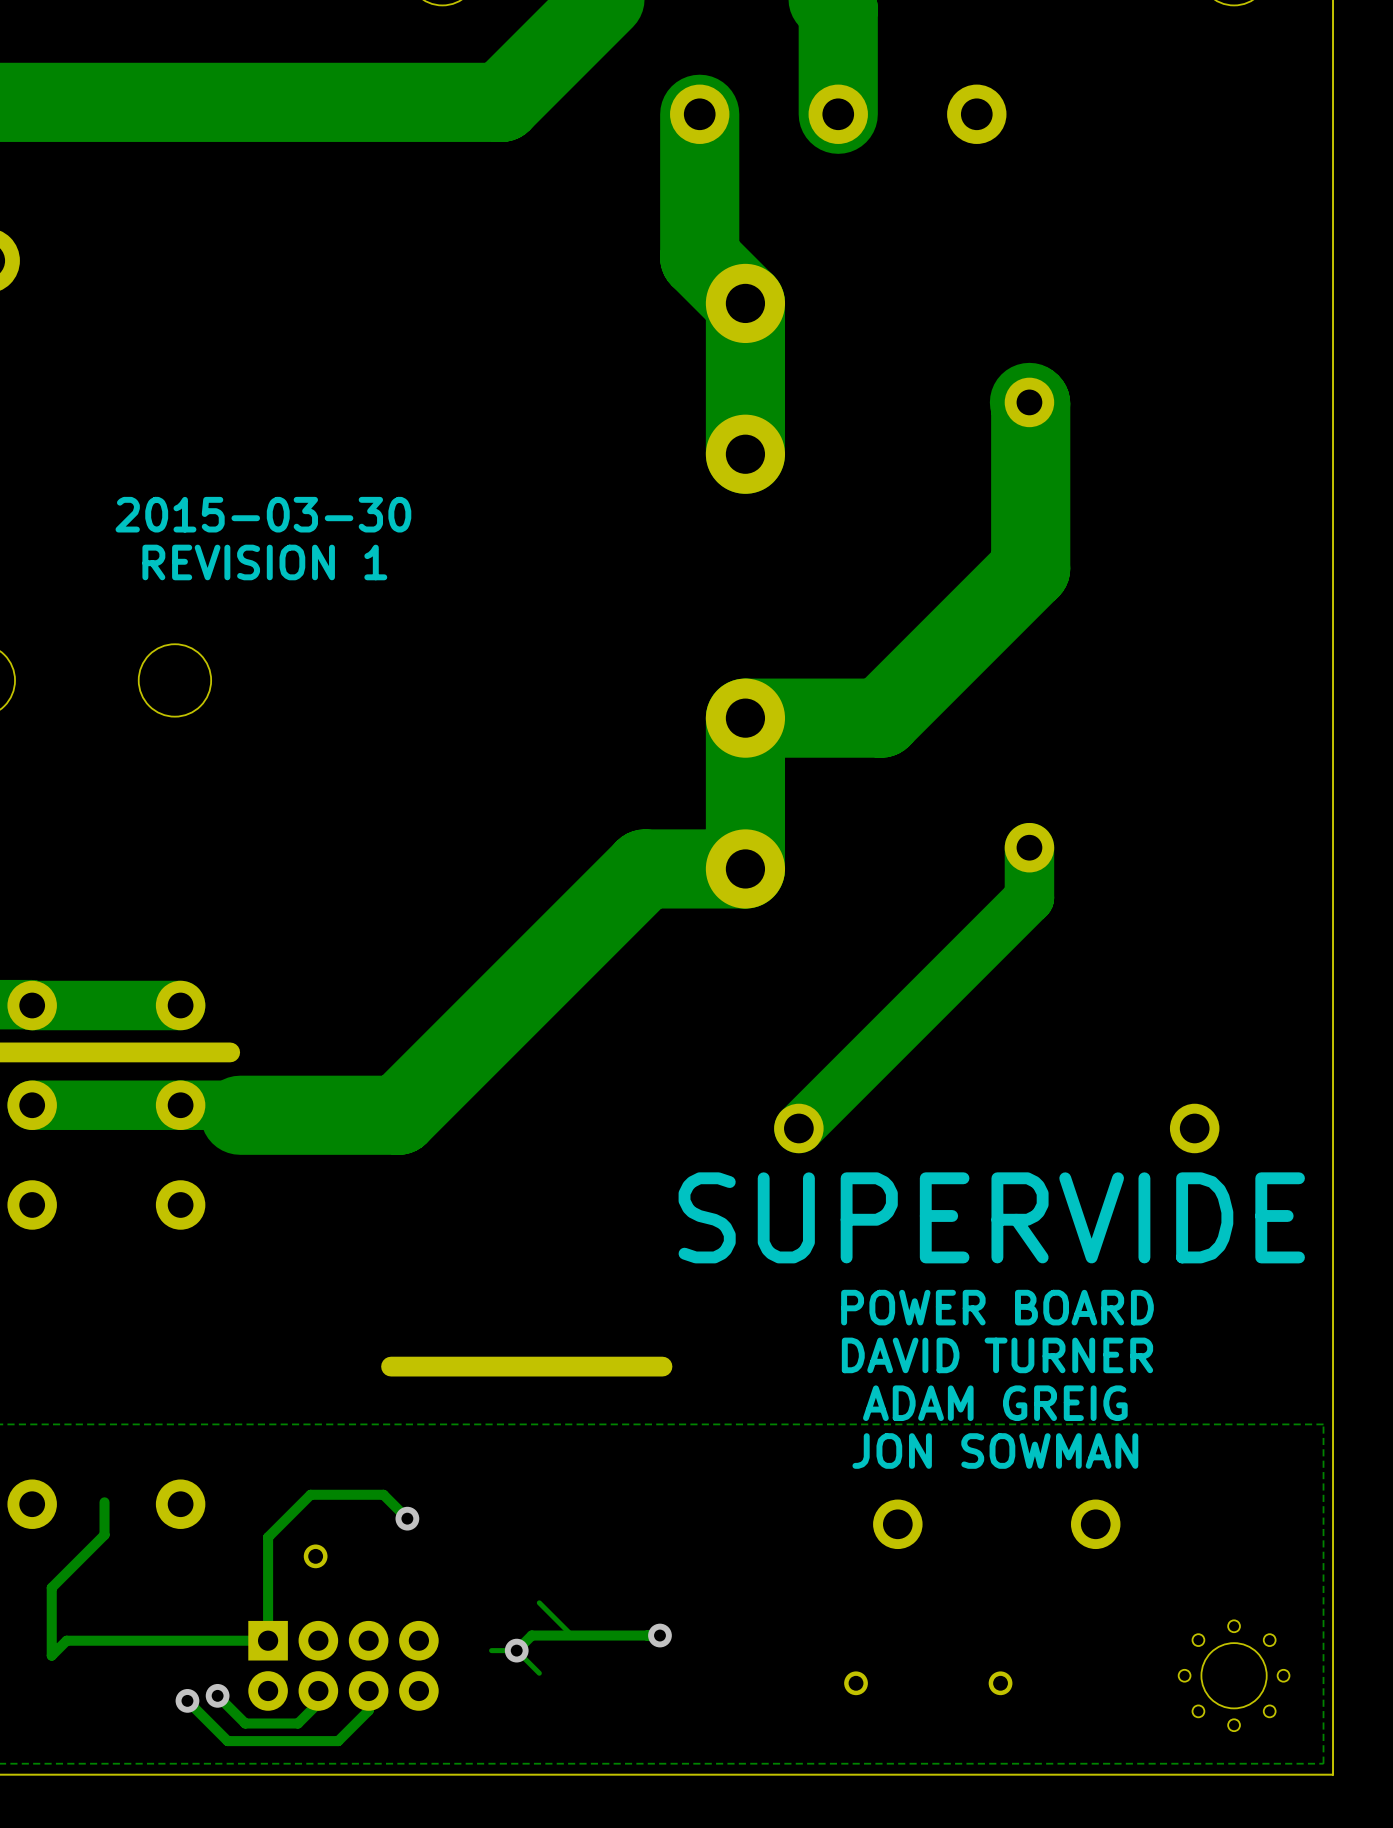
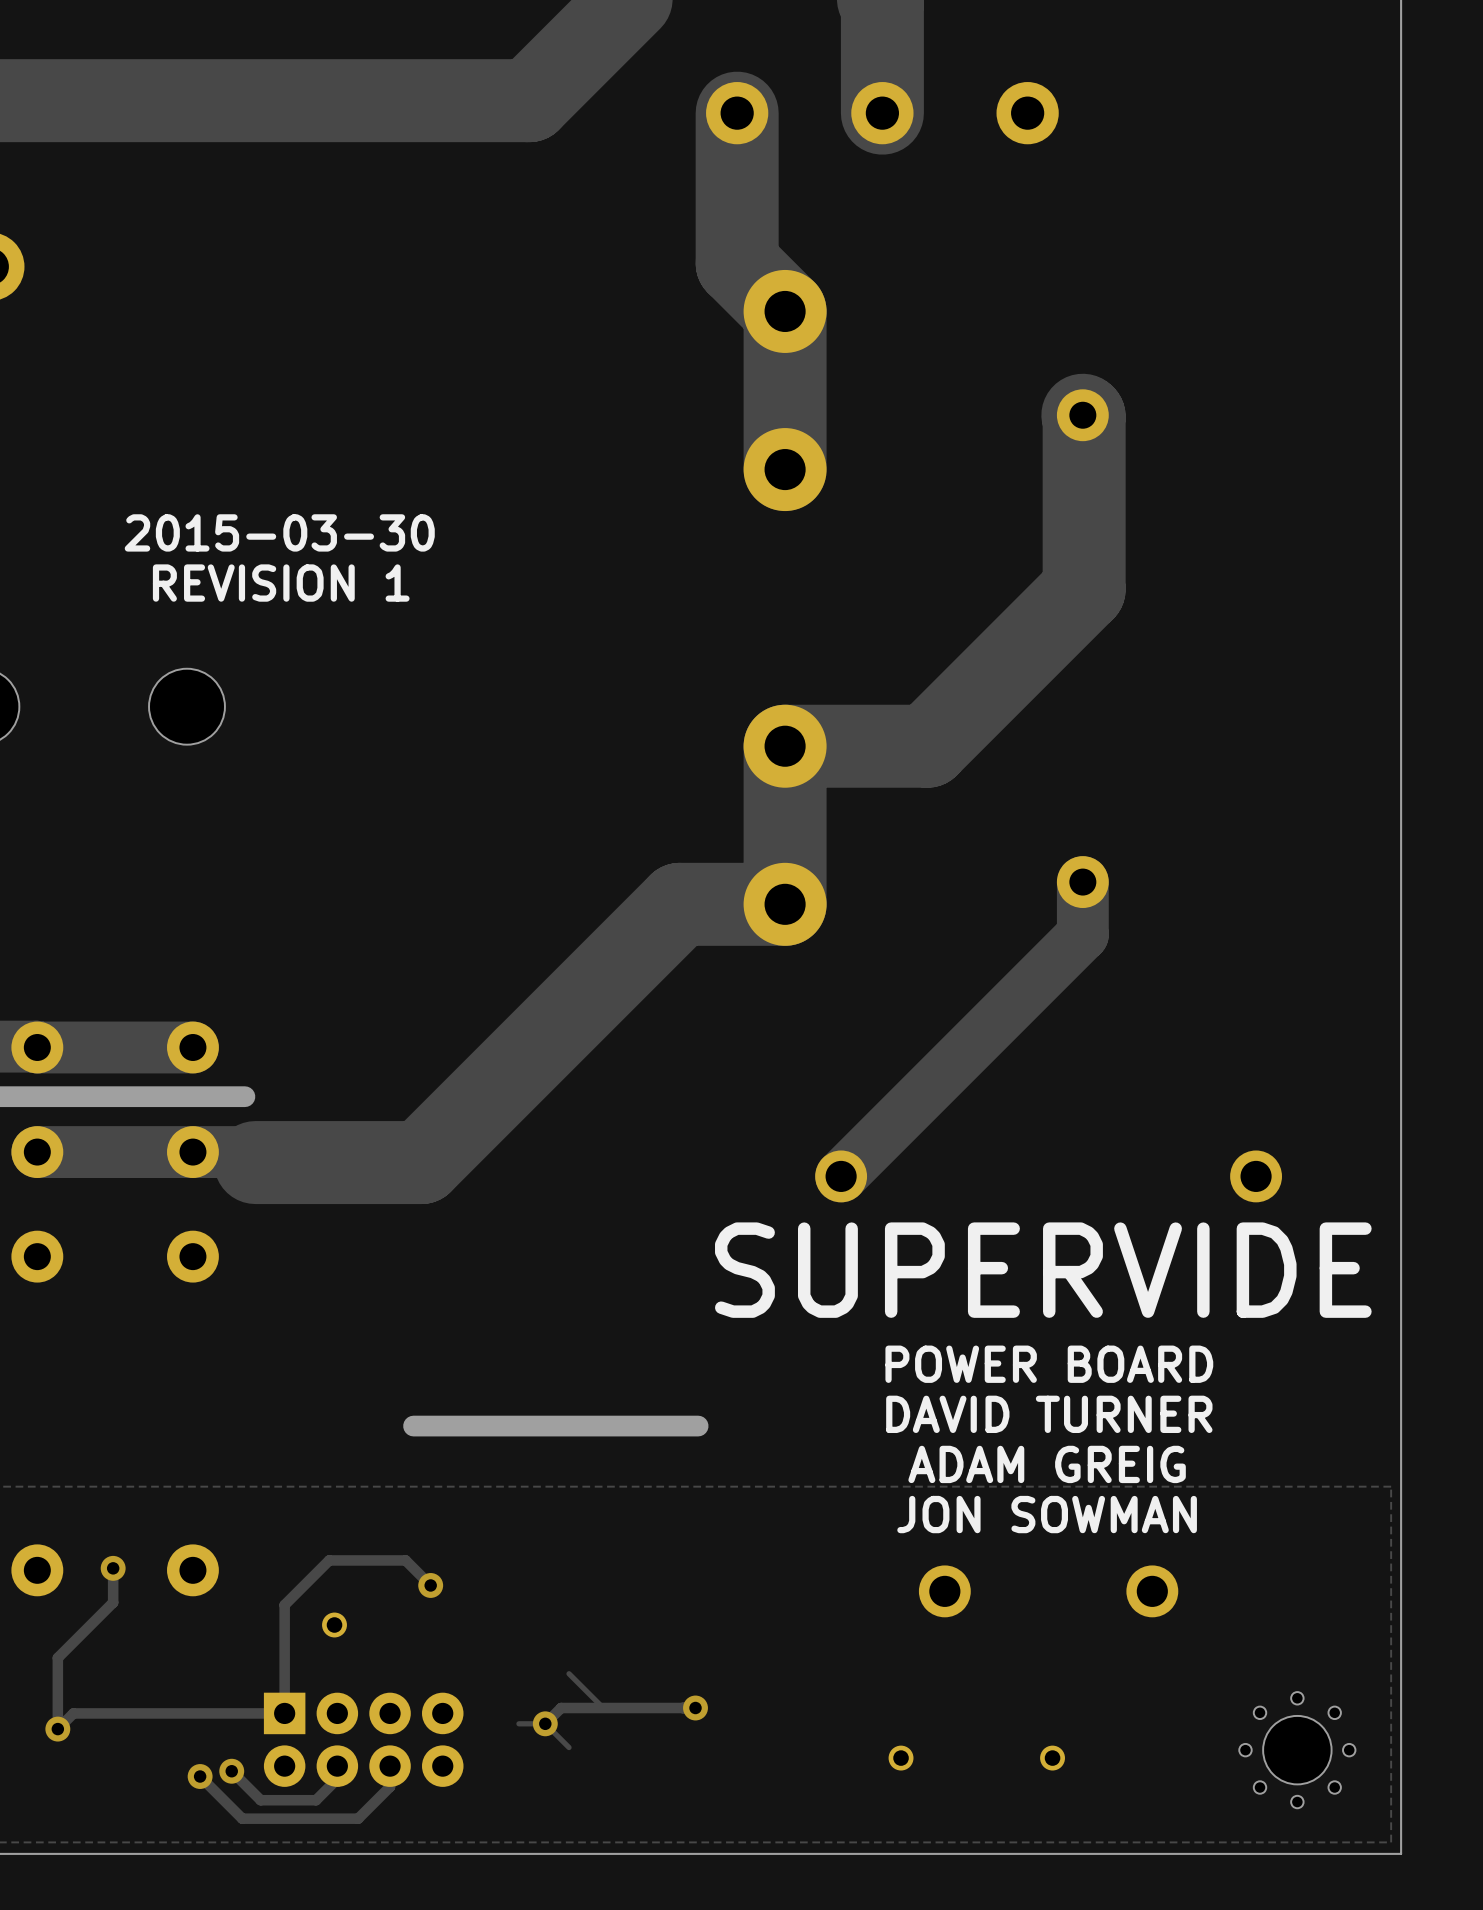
via: none -> (113, 1568)
via: none -> (57, 1729)

